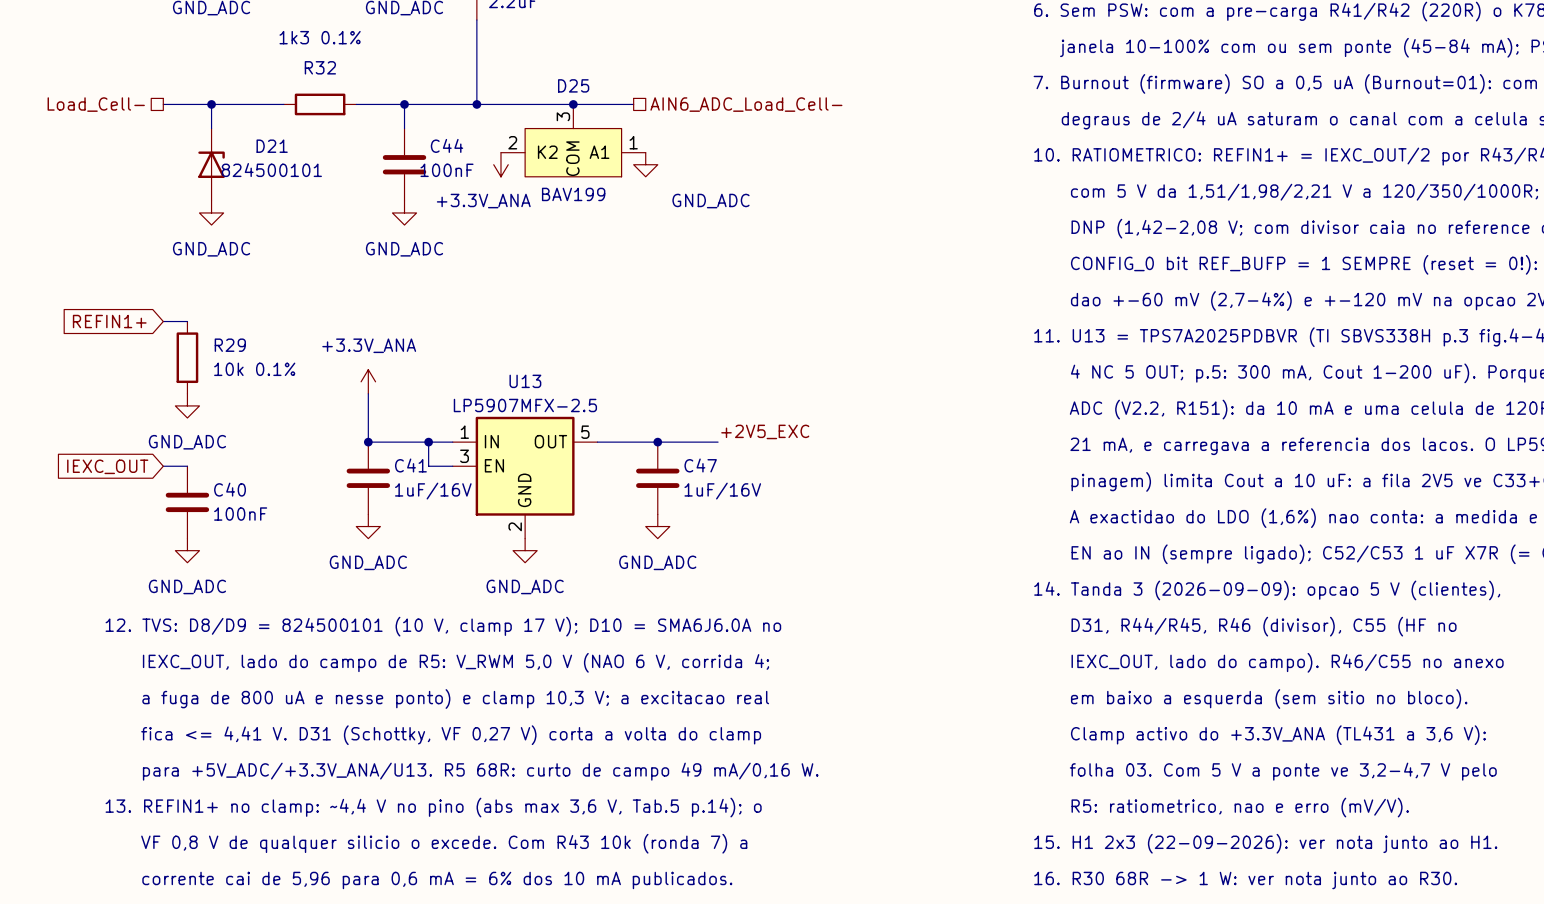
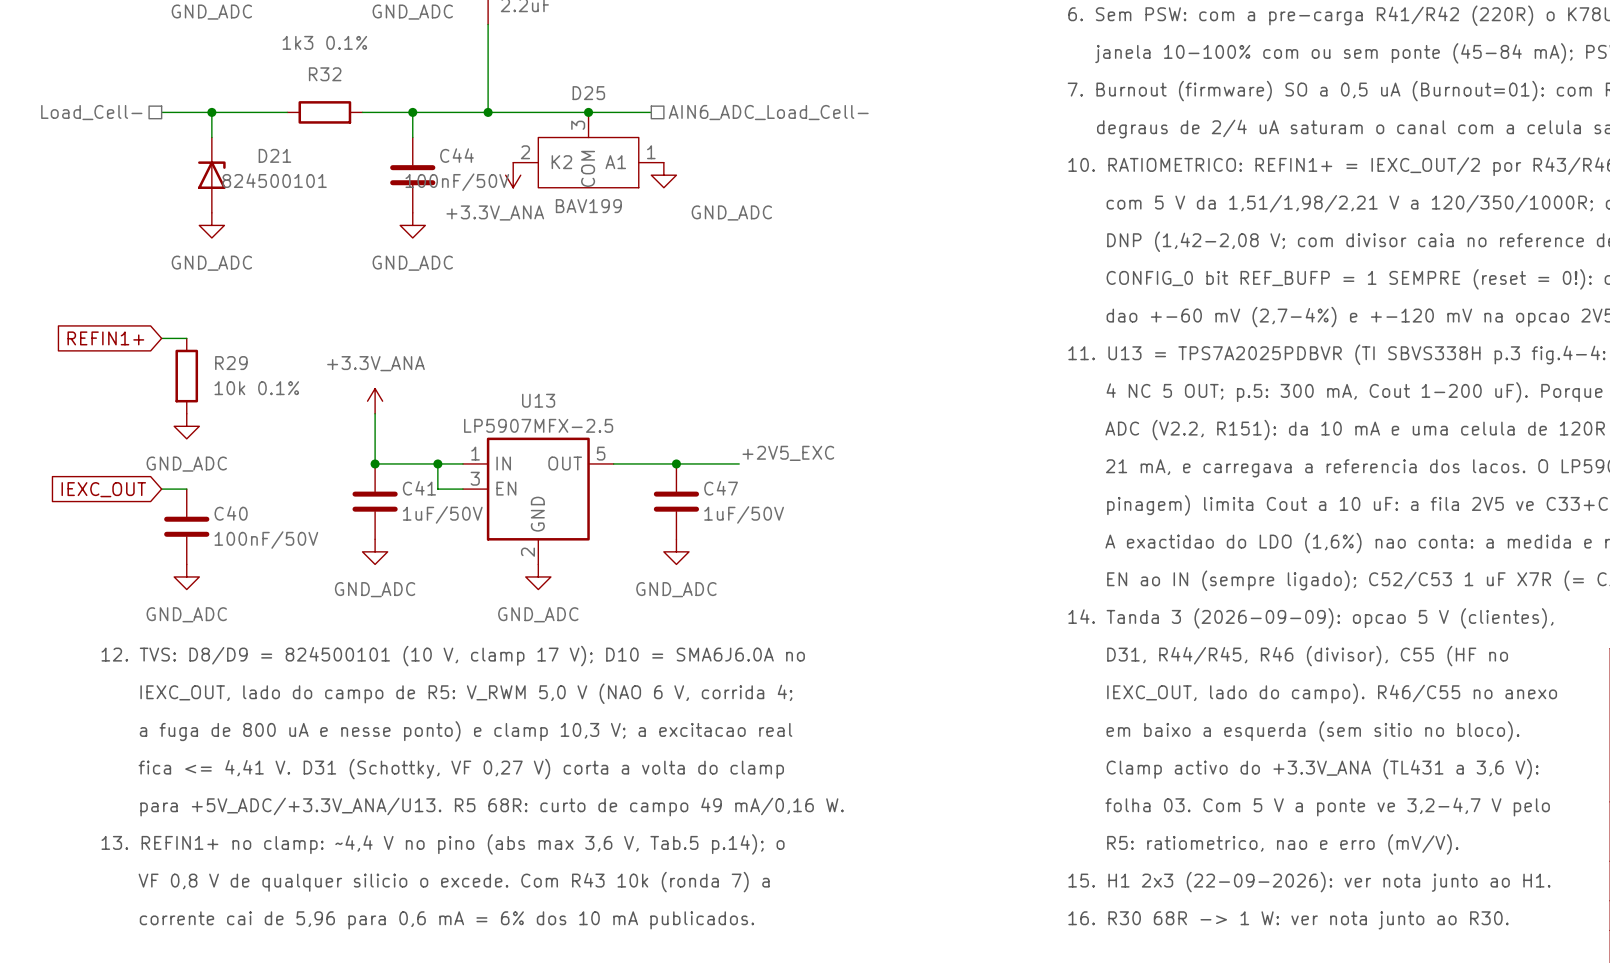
C44 value: 100nF (447, 170) -> 100nF/50V (457, 182)
C41 value: 1uF/16V (433, 491) -> 1uF/50V (442, 514)
C47 value: 1uF/16V (722, 491) -> 1uF/50V (744, 514)
C40 value: 100nF (240, 514) -> 100nF/50V (266, 540)

